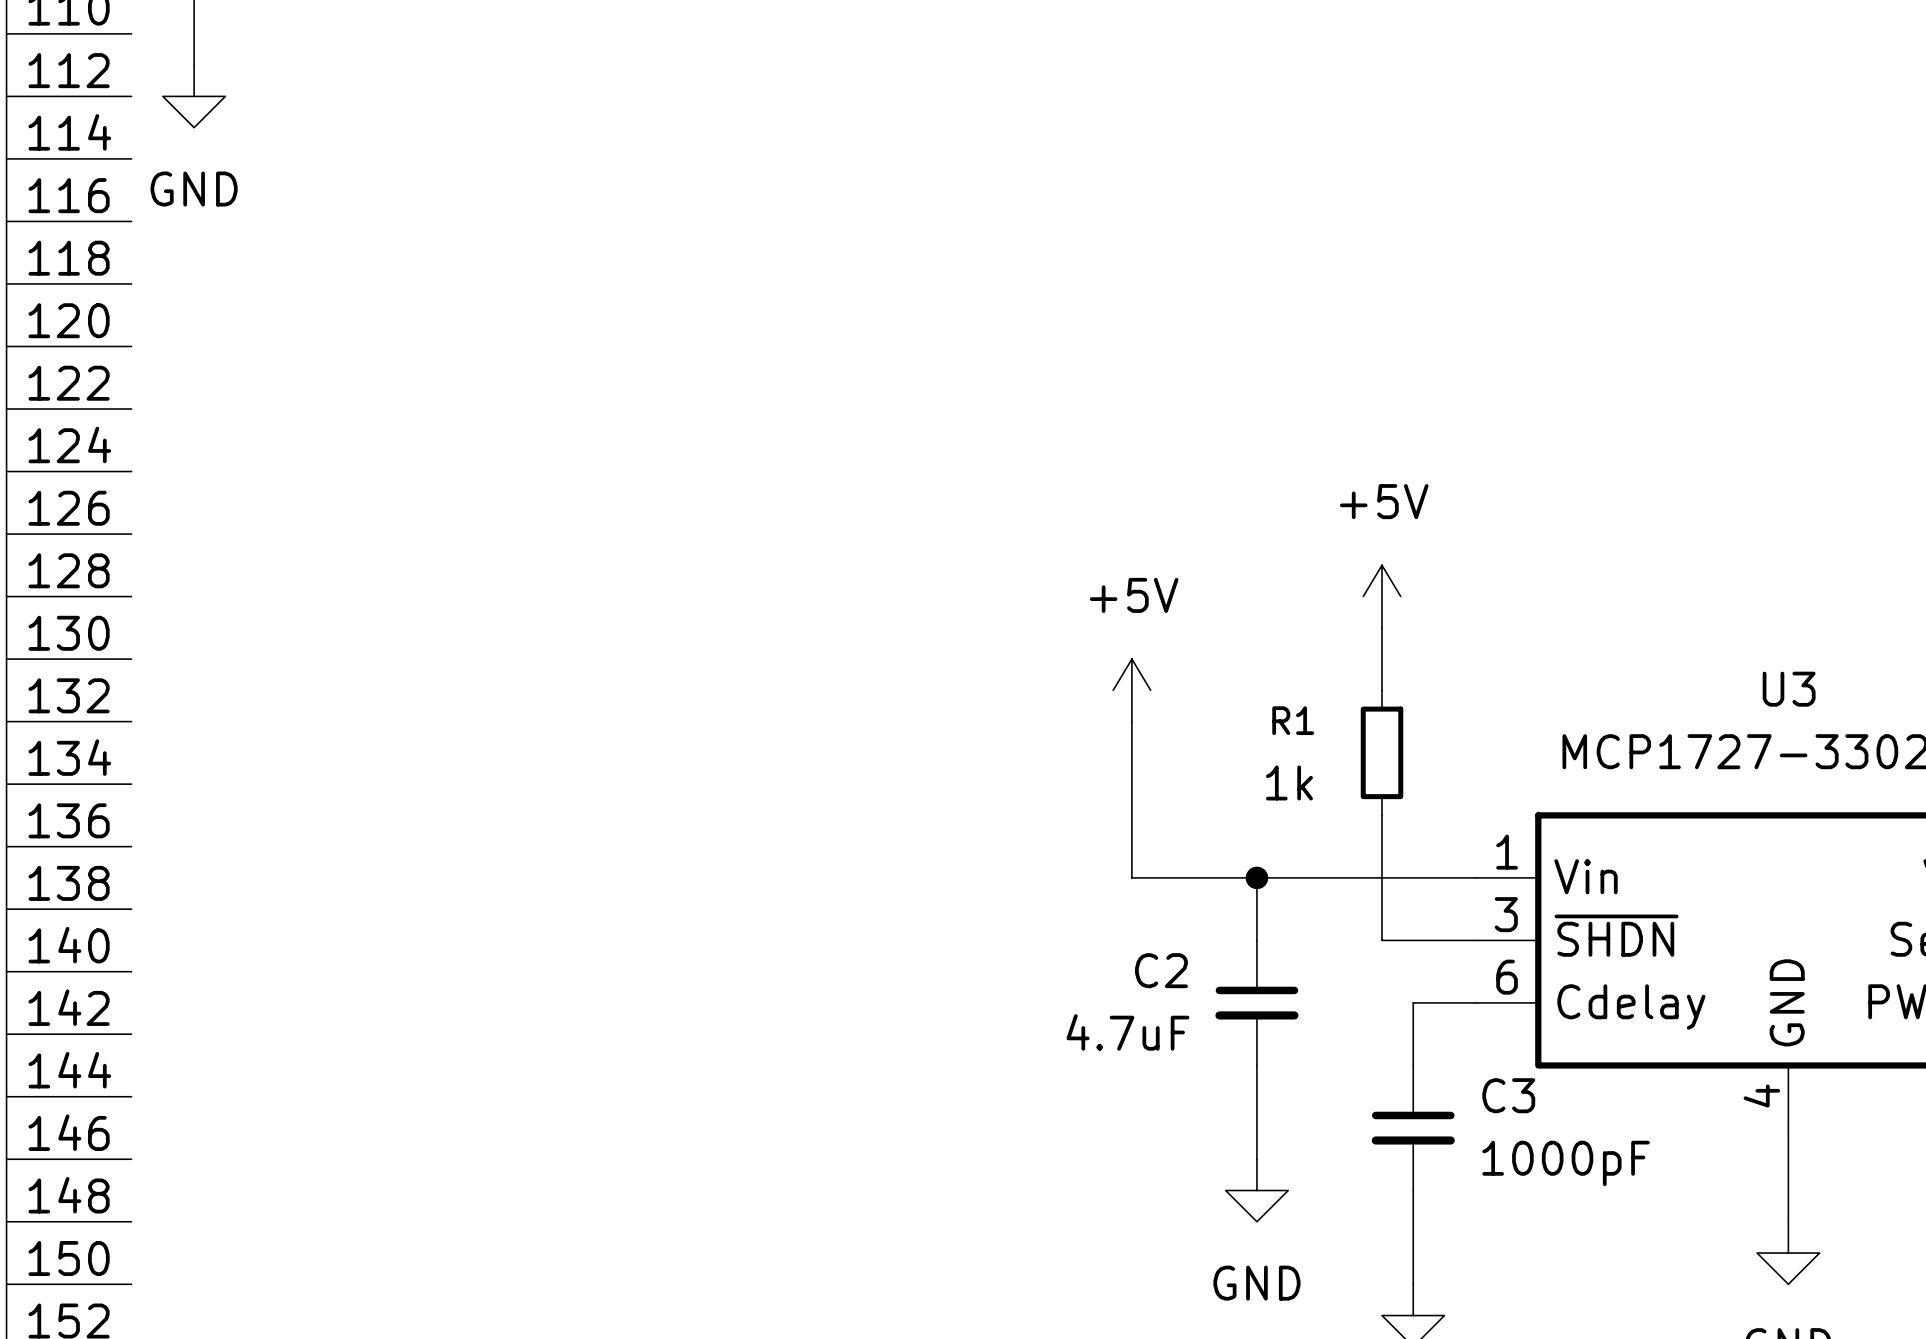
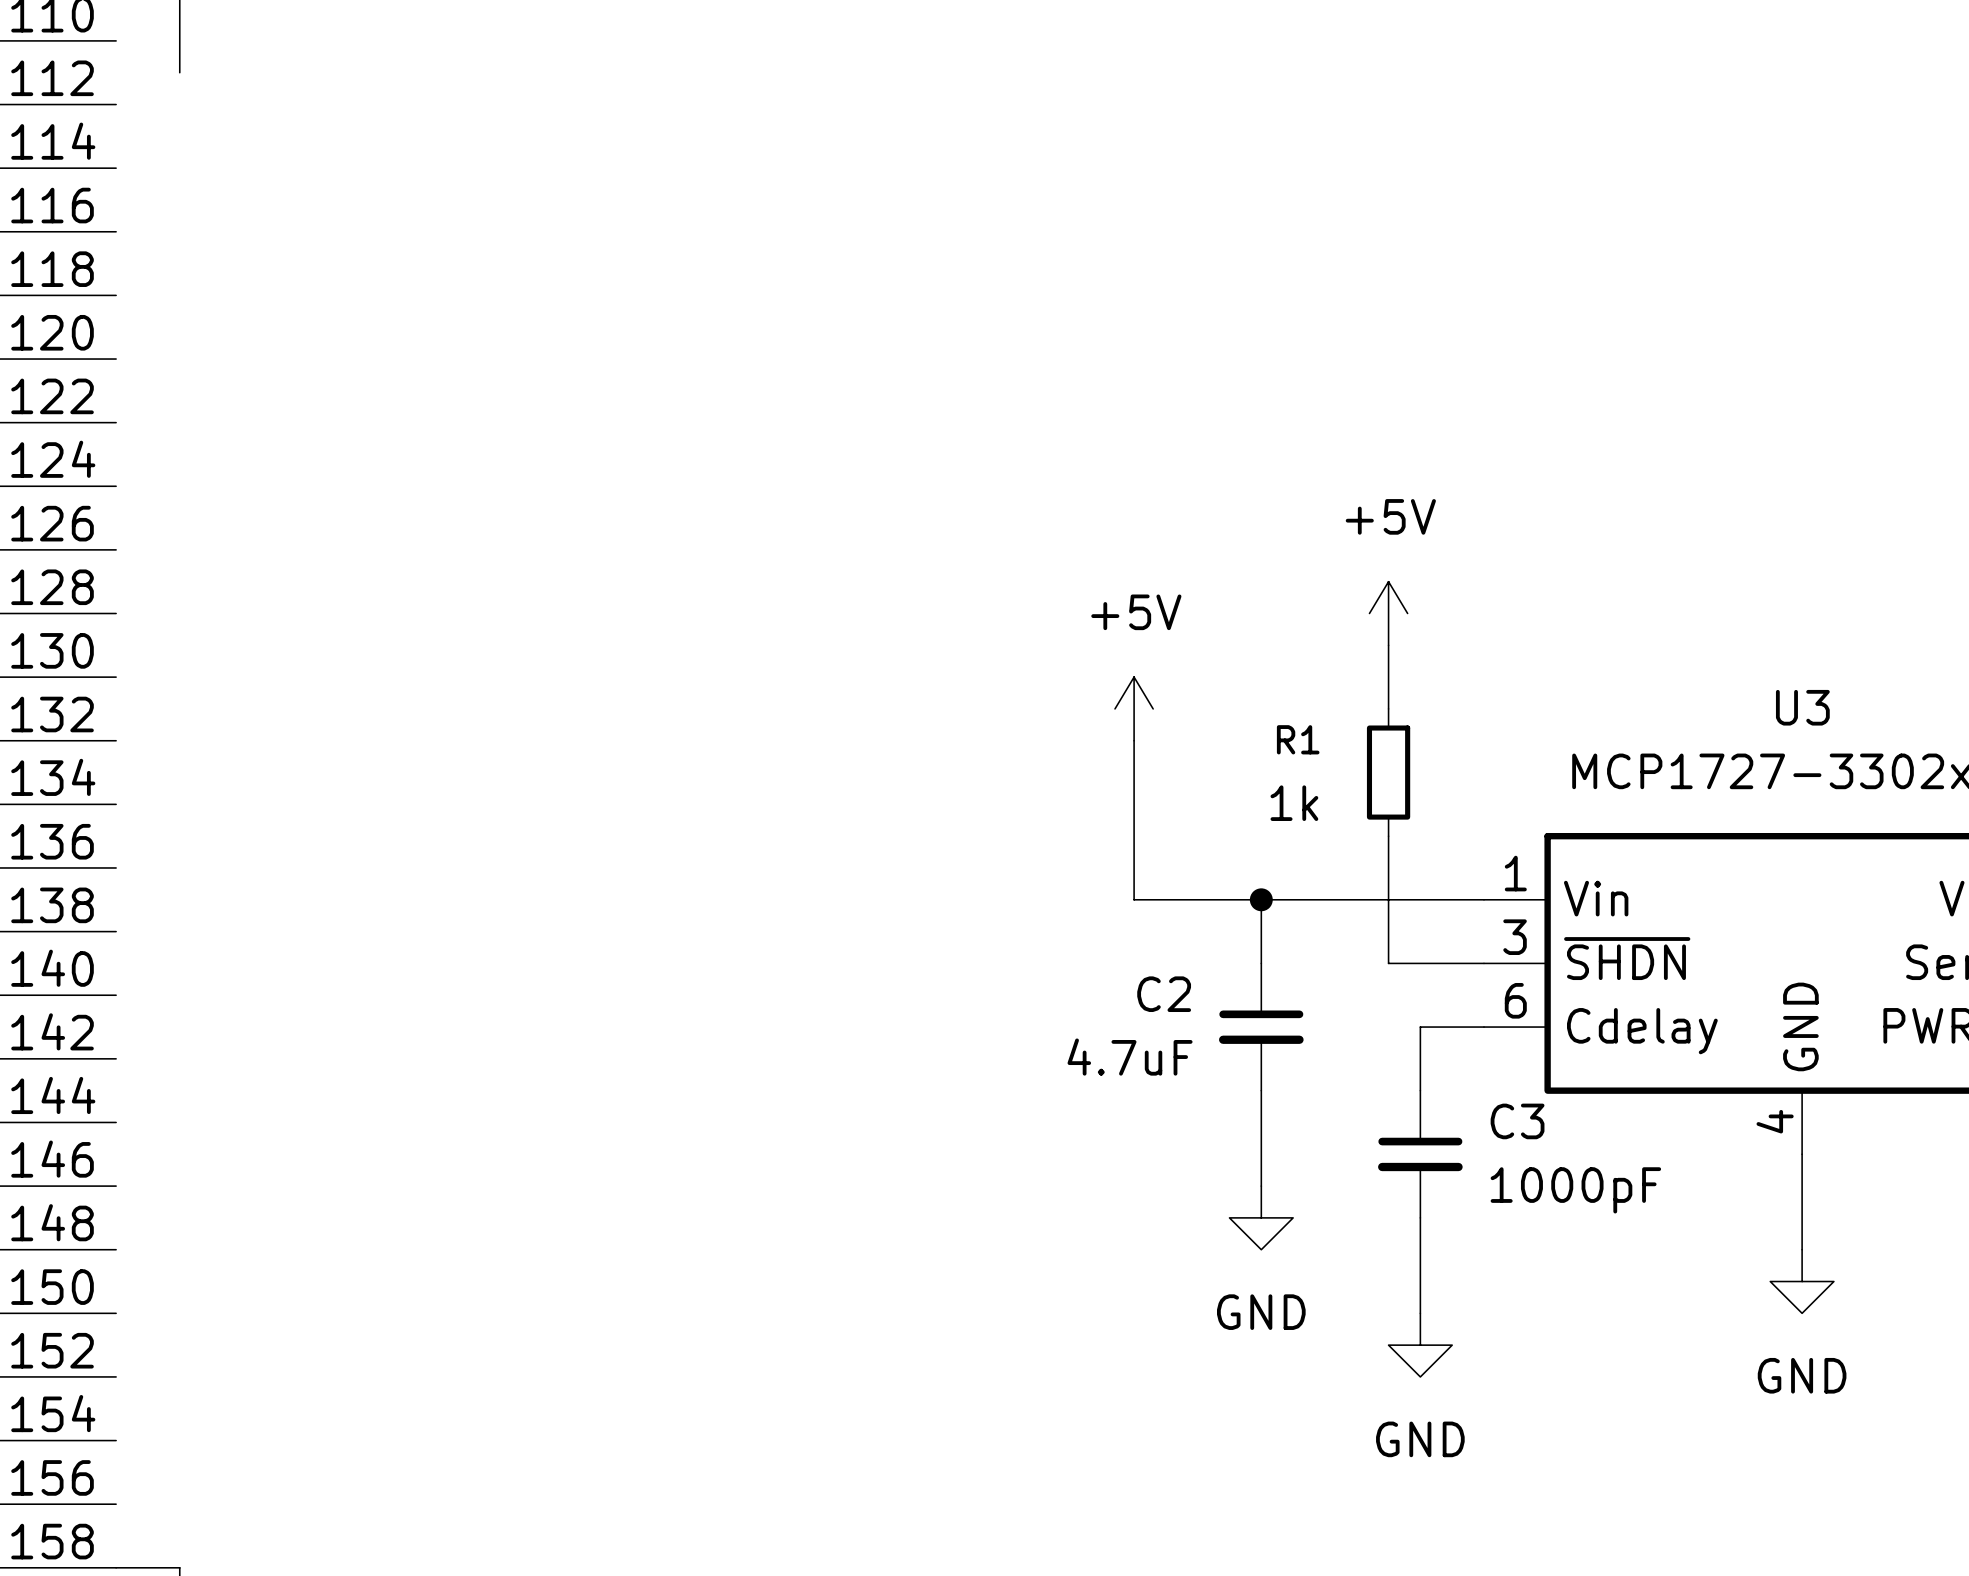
power symbol: GND (194, 96) -> none

